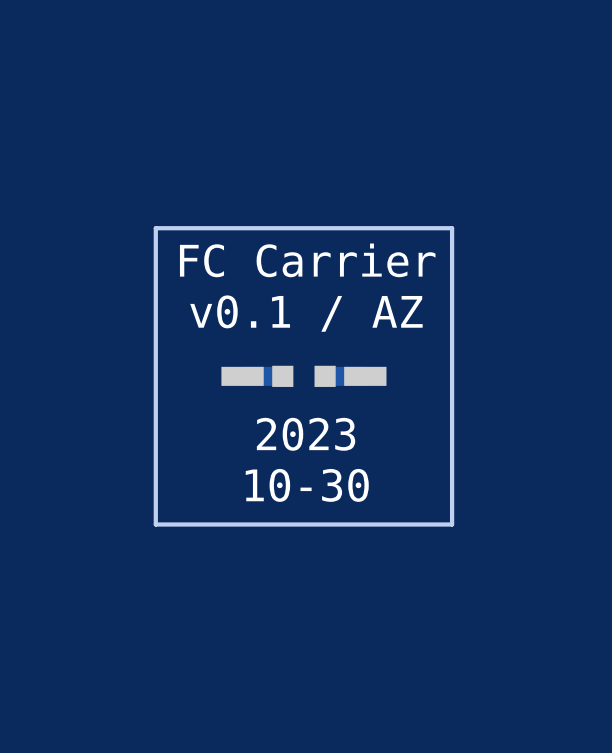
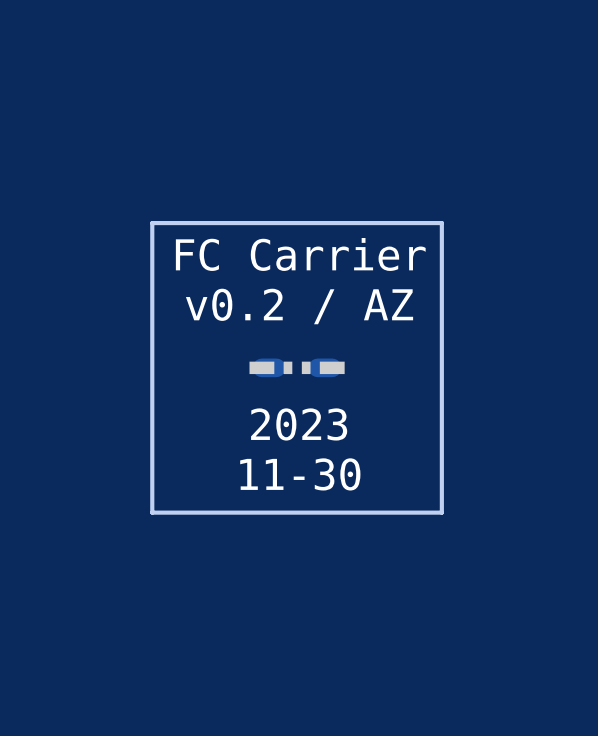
text: v0.1 / AZ (306, 313) -> v0.2 / AZ (299, 306)
part footprint: [272, 365, 336, 387] -> [283, 361, 311, 375]
part: (242, 376) -> none
part: none -> (261, 367)
part: none -> (332, 367)
part: (365, 376) -> none
text: 10-30 (307, 485) -> 11-30 (300, 474)

